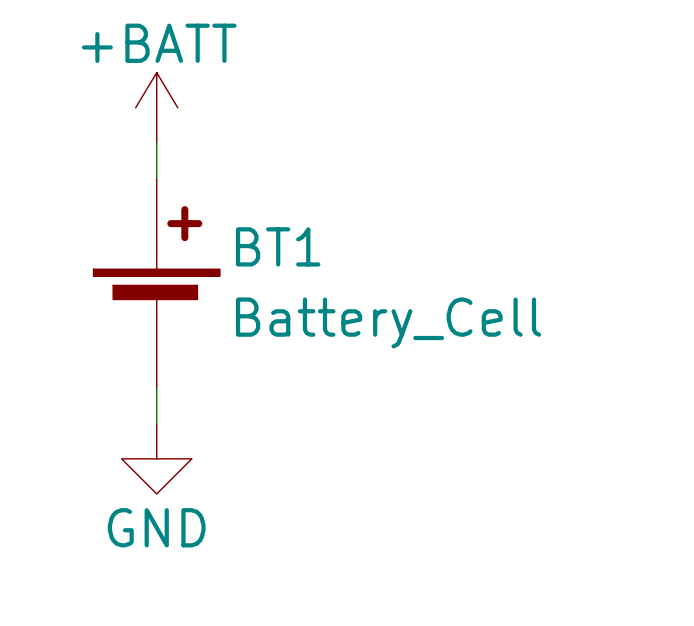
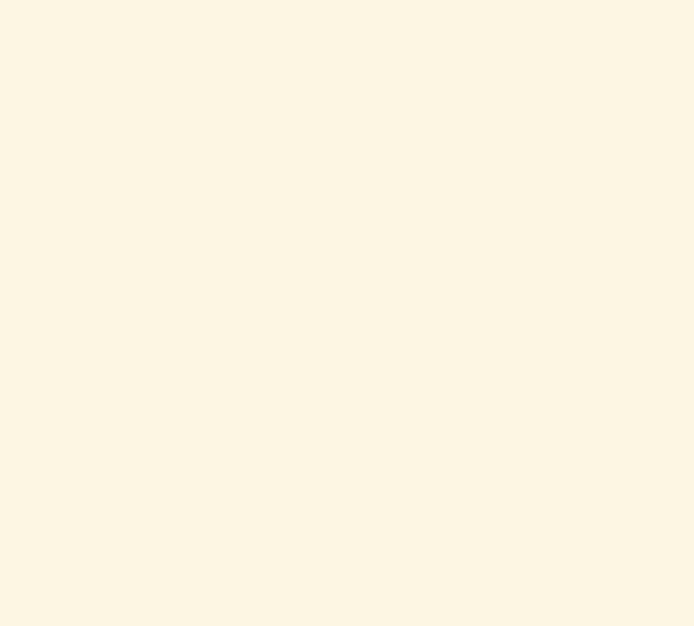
power symbol: +BATT (156, 107) -> none
wire: (156, 142) (156, 177) -> none
BT1: Battery_Cell (156, 283) -> none
wire: (156, 388) (156, 423) -> none
power symbol: GND (156, 458) -> none

